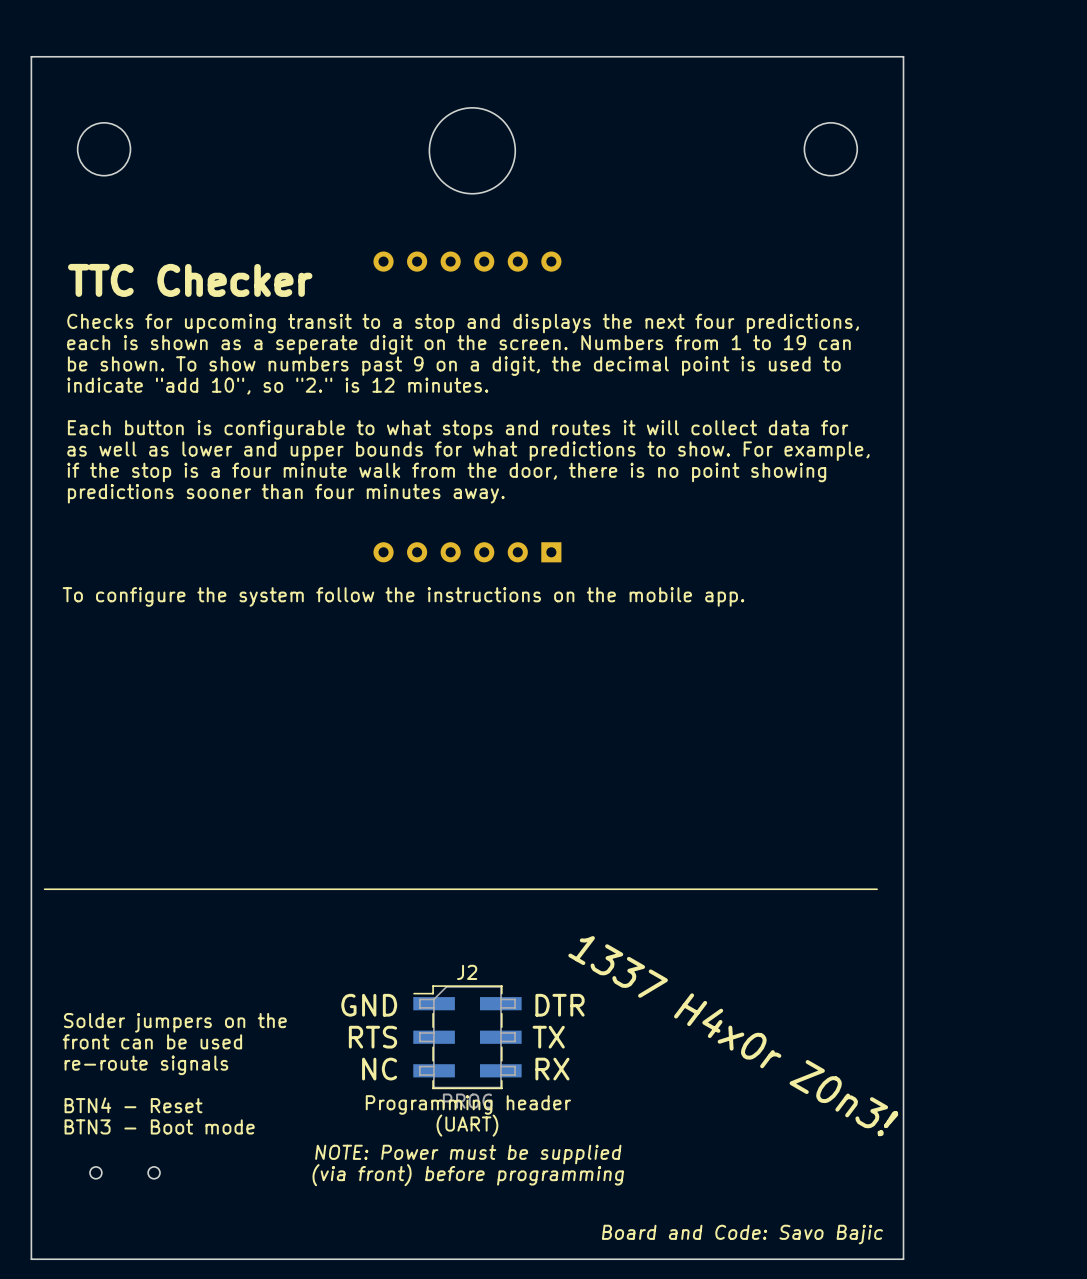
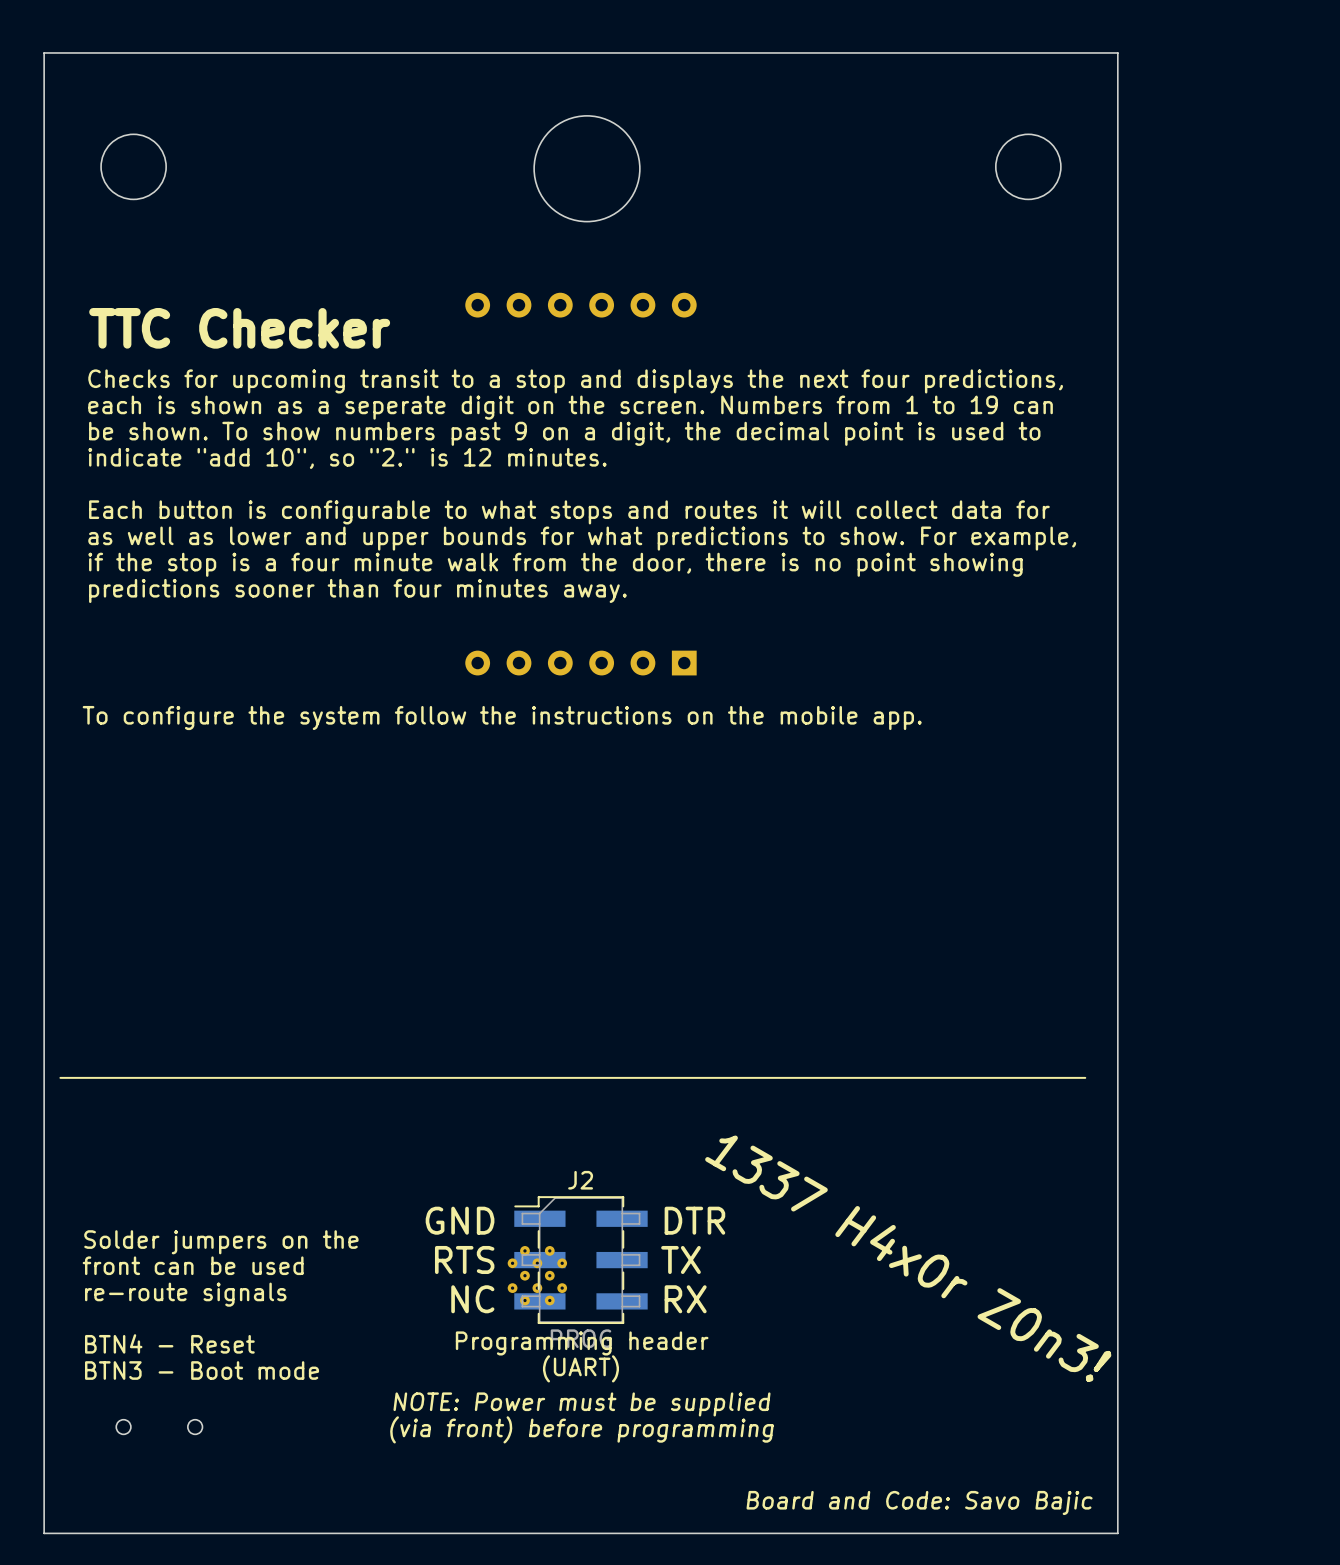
part: none -> (537, 1275)

